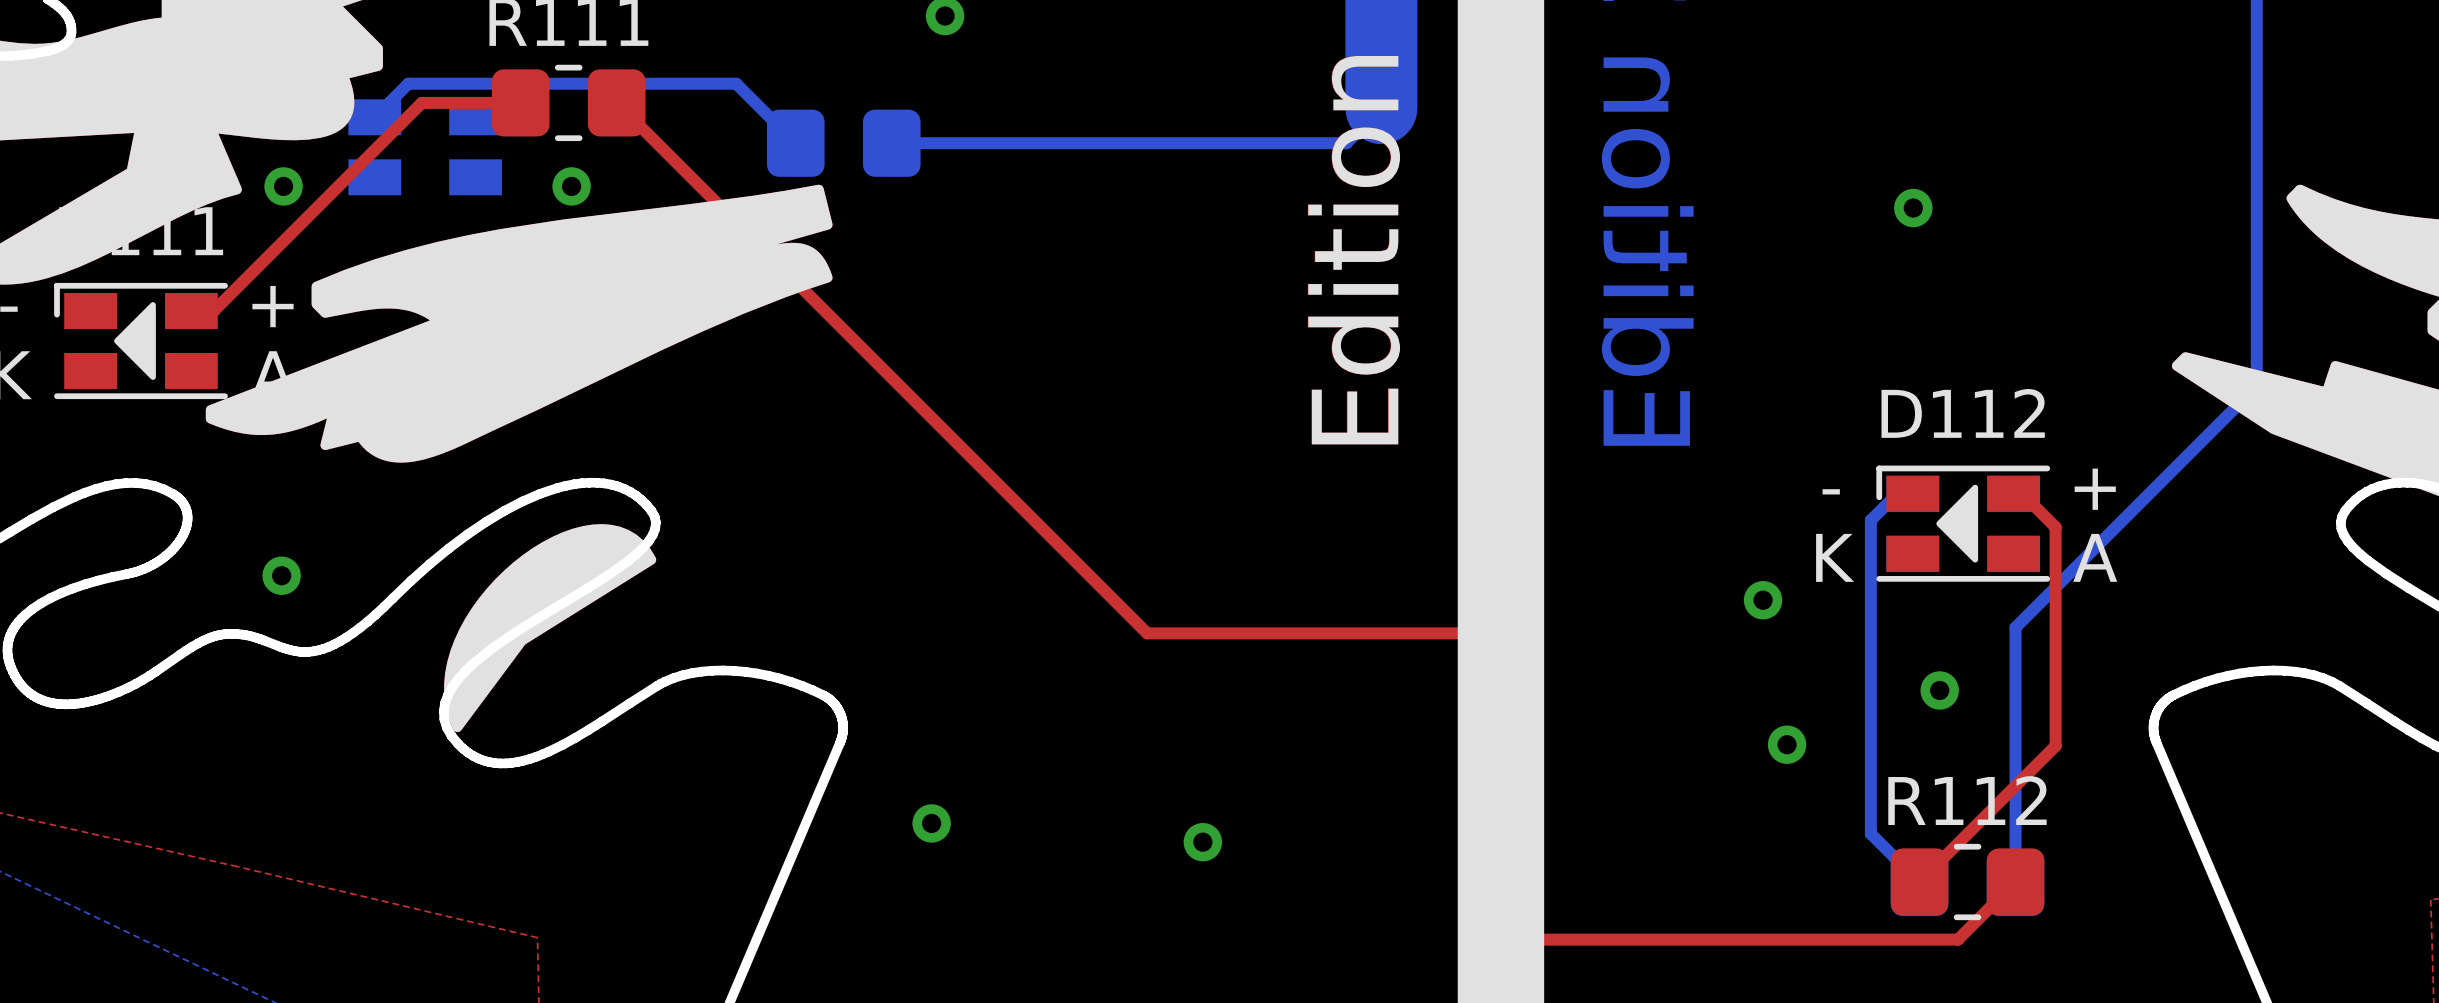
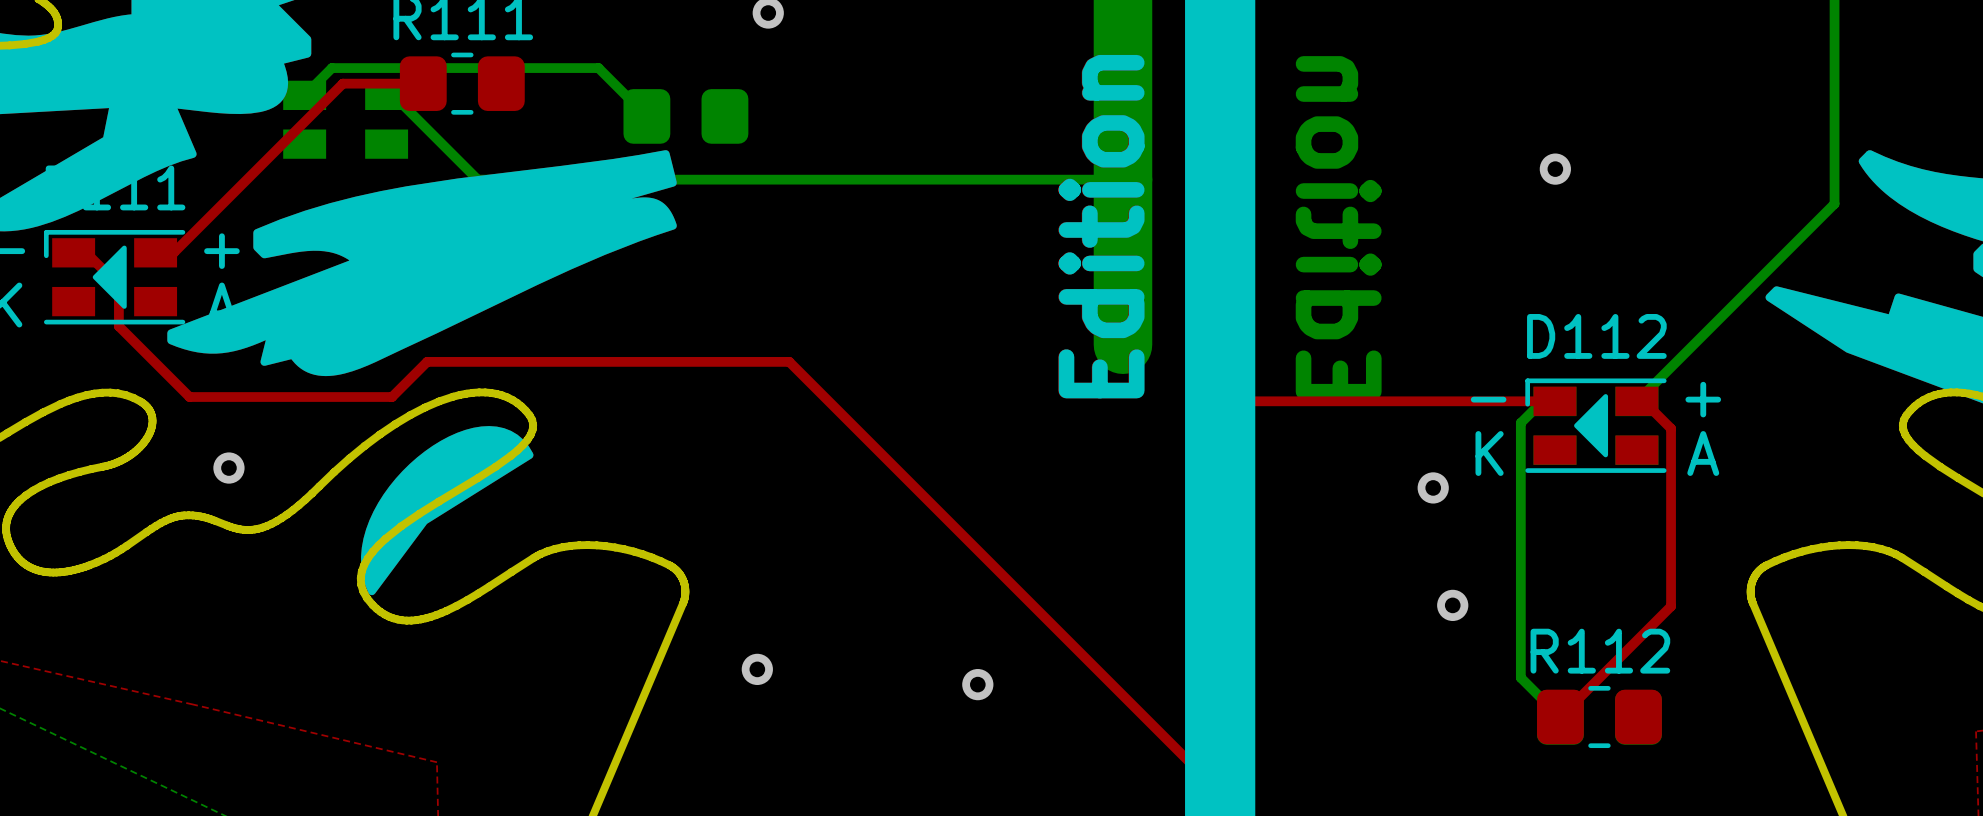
top track: (616, 102) (1147, 633) (1498, 633) -> none
bottom track: (1381, 108) (1346, 143) (891, 143) -> (1122, 87) (1122, 344) (1107, 328)
bottom track: none -> (393, 95) (477, 179) (1122, 179)
via: (283, 186) -> none
via: (571, 186) -> none
bottom track: (2256, 250) (2256, 386) (2015, 627) (2015, 882) -> (1834, 203) (1636, 401)
top track: none -> (86, 252) (118, 285) (118, 326) (189, 397) (392, 397) (427, 361) (789, 361) (1210, 783)
top track: none -> (1227, 401) (1554, 401)
via: (1939, 690) -> none
top track: (2015, 882) (1957, 939) (1498, 939) -> none

